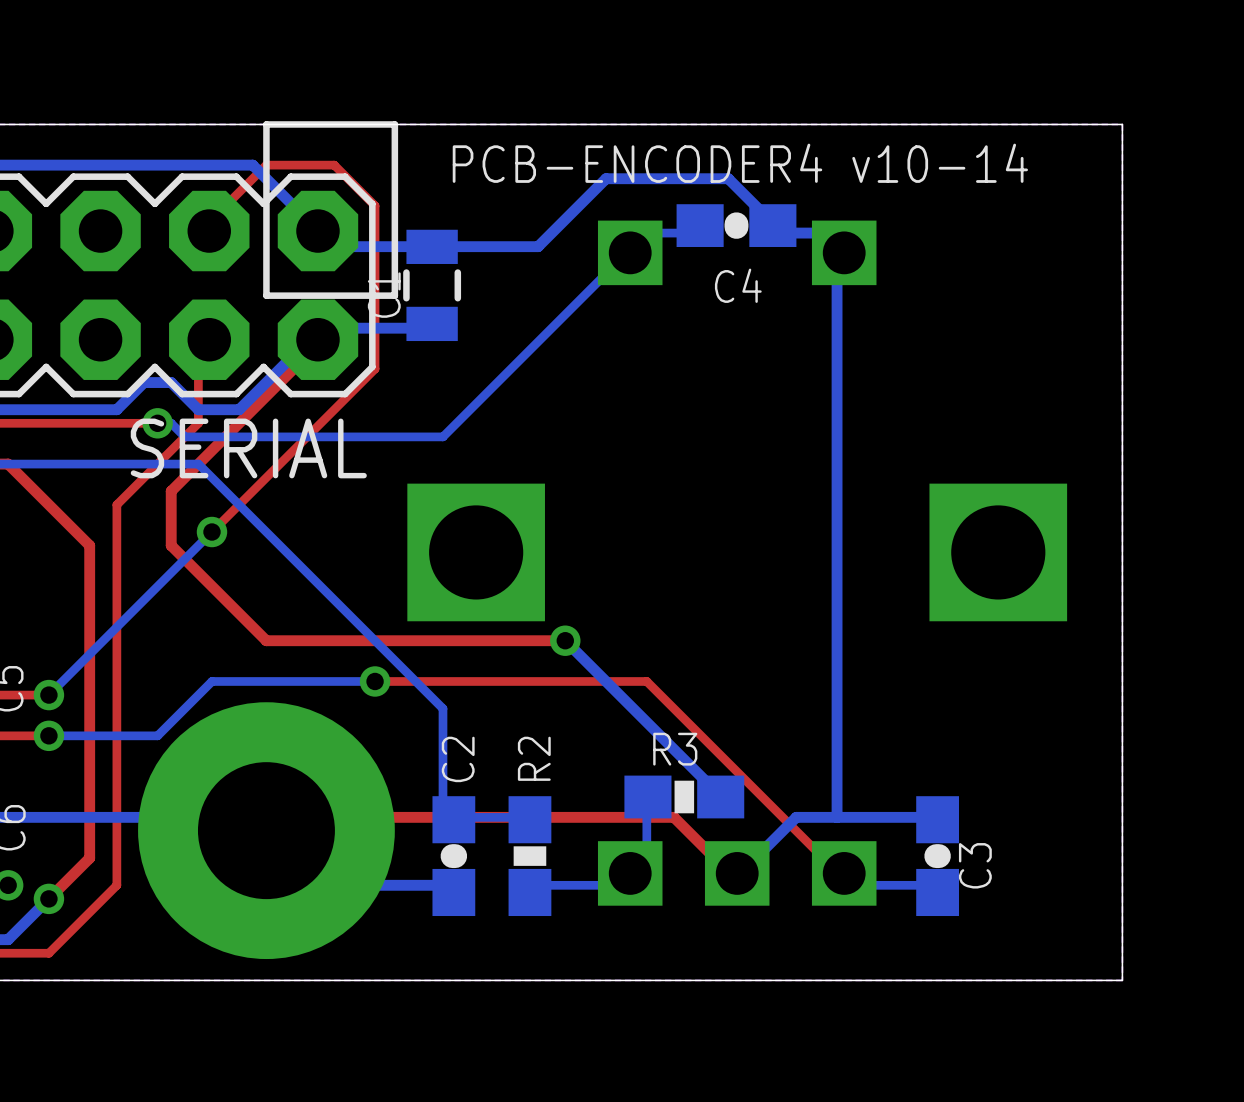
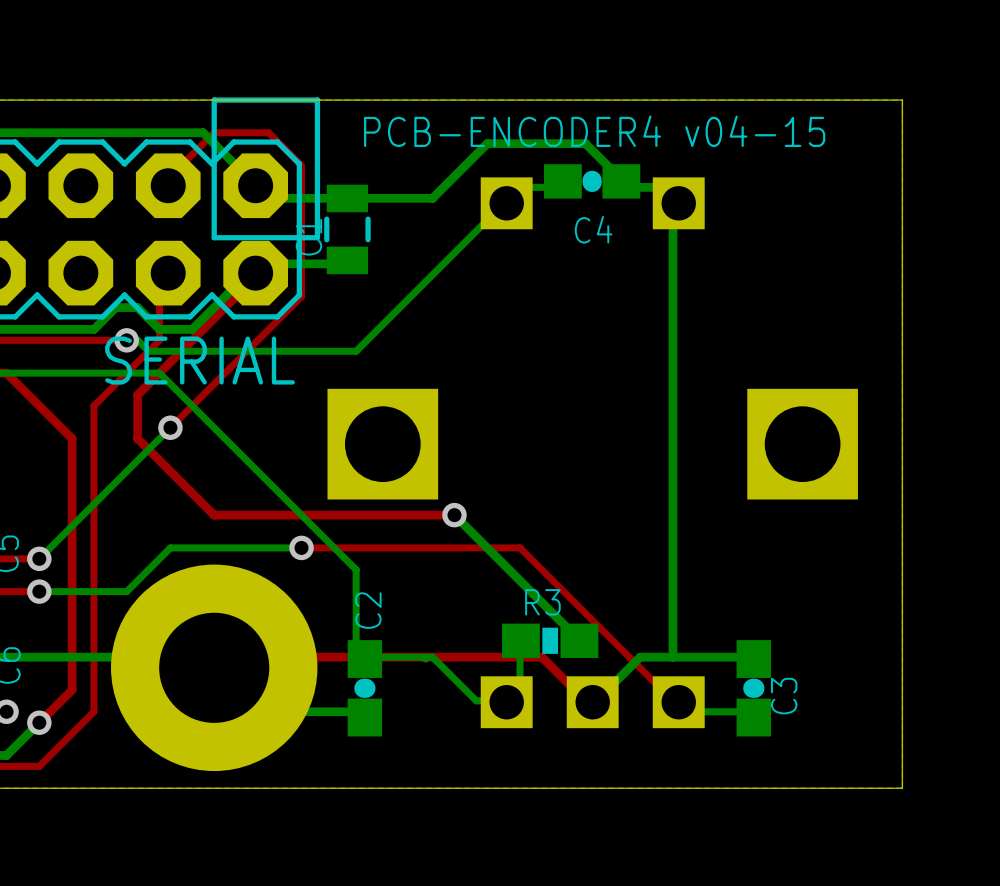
text: PCB-ENCODER4 v10-14 (740, 163) -> PCB-ENCODER4 v04-15 (594, 131)
R2: (529, 856) -> none
bottom track: (630, 873) (619, 885) (538, 885) (529, 892) -> (506, 702) (476, 700) (432, 657) (421, 657)

